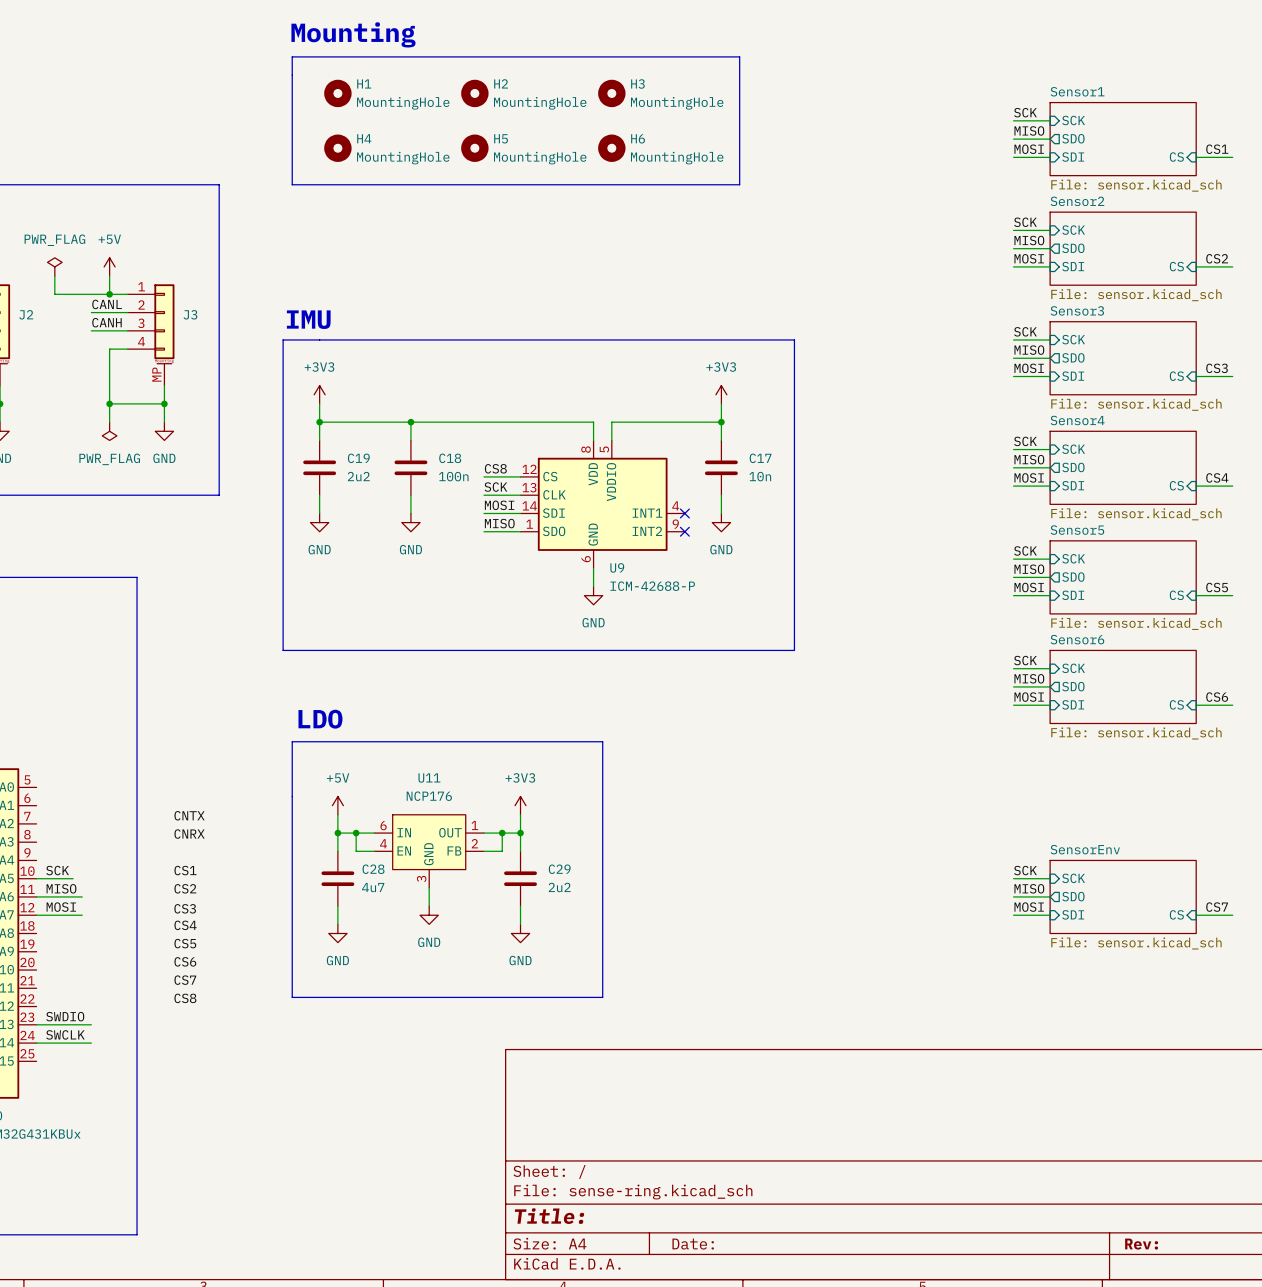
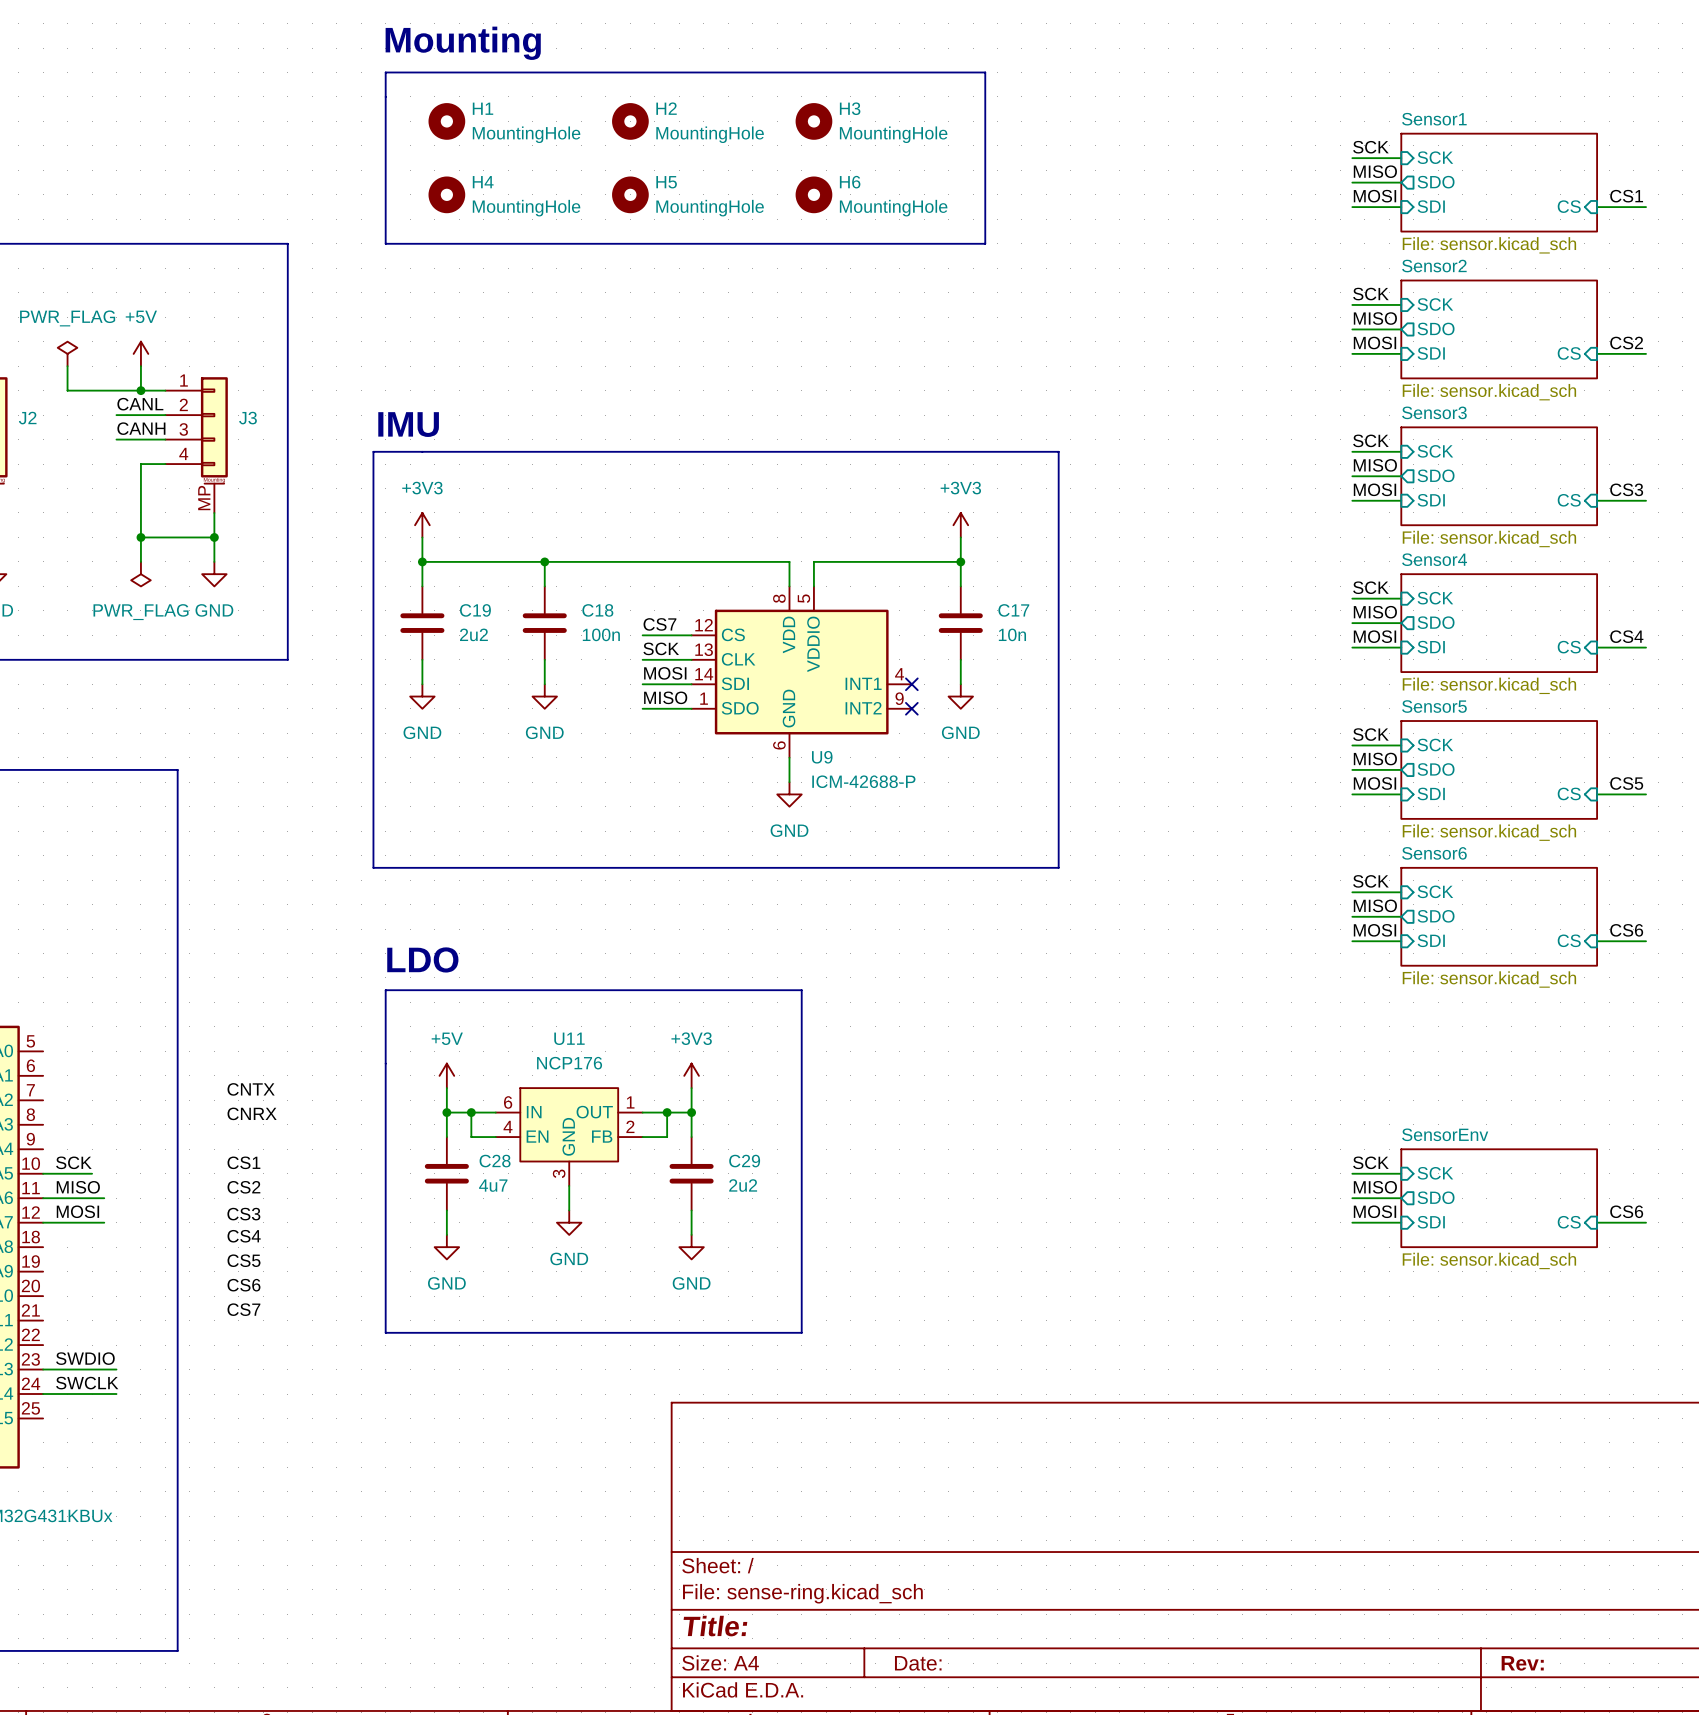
label: CS8 (495, 468) -> CS7 (659, 624)
label: CS7 (1217, 907) -> CS6 (1626, 1211)
label: CS8 (185, 998) -> none

